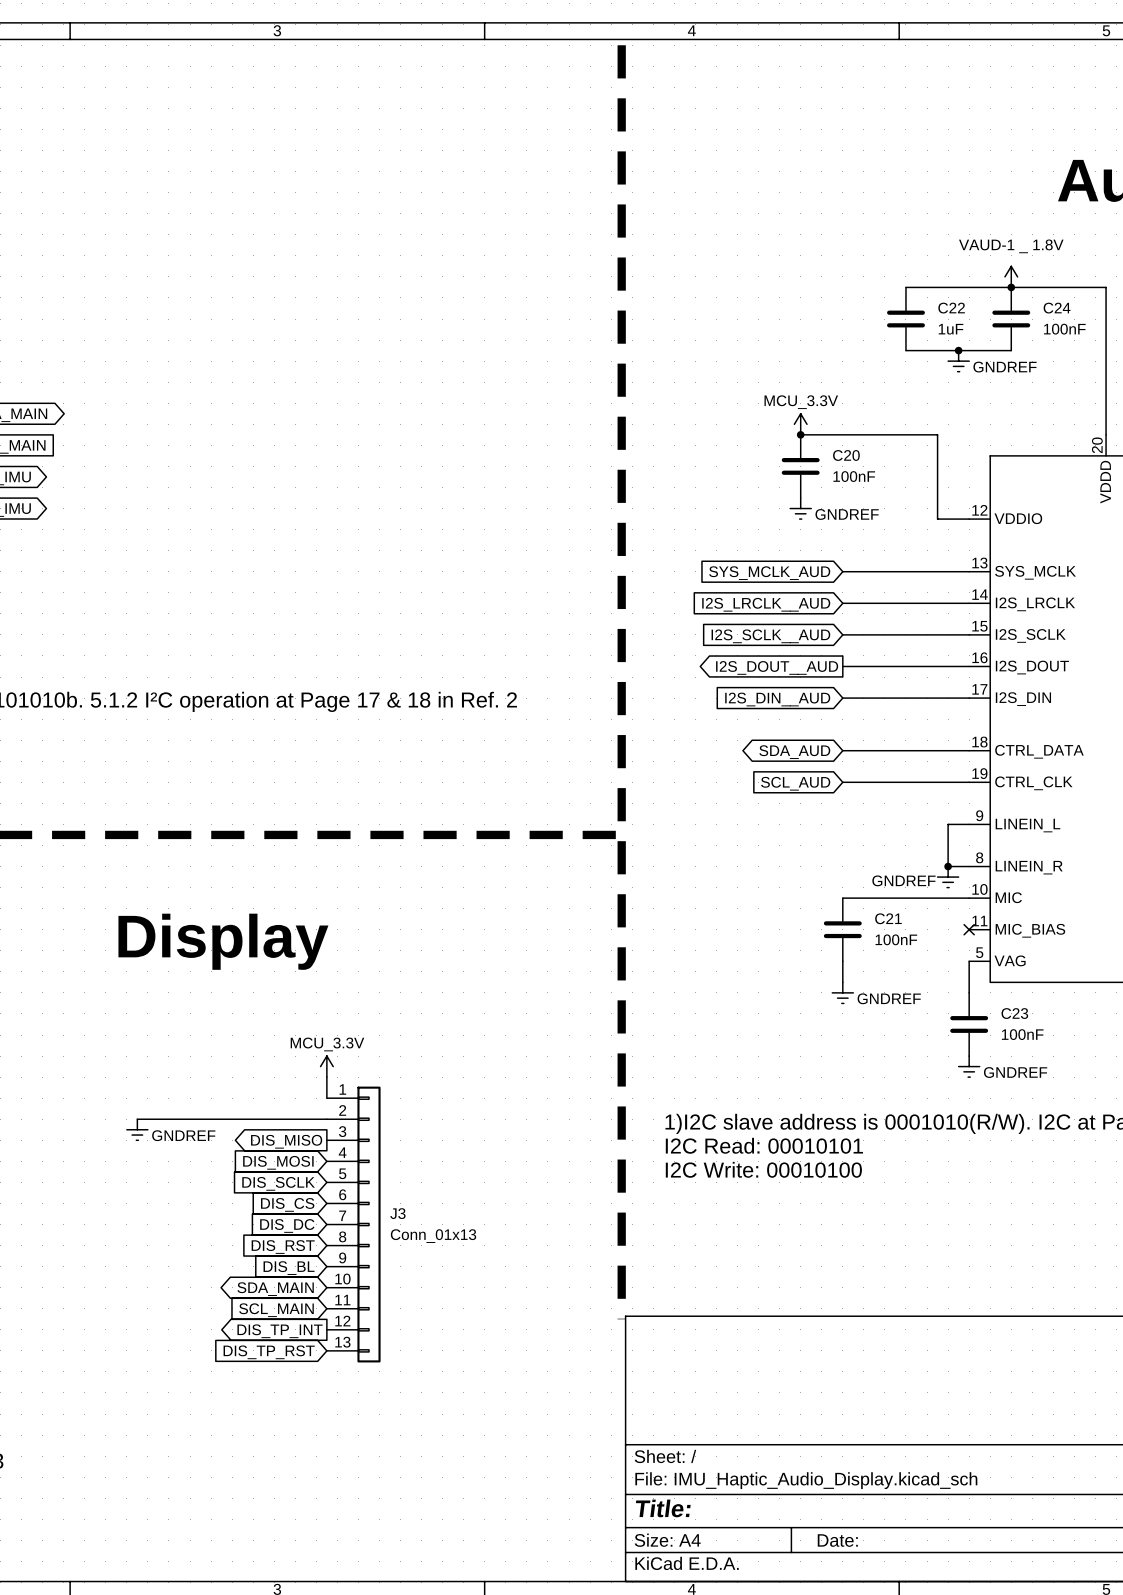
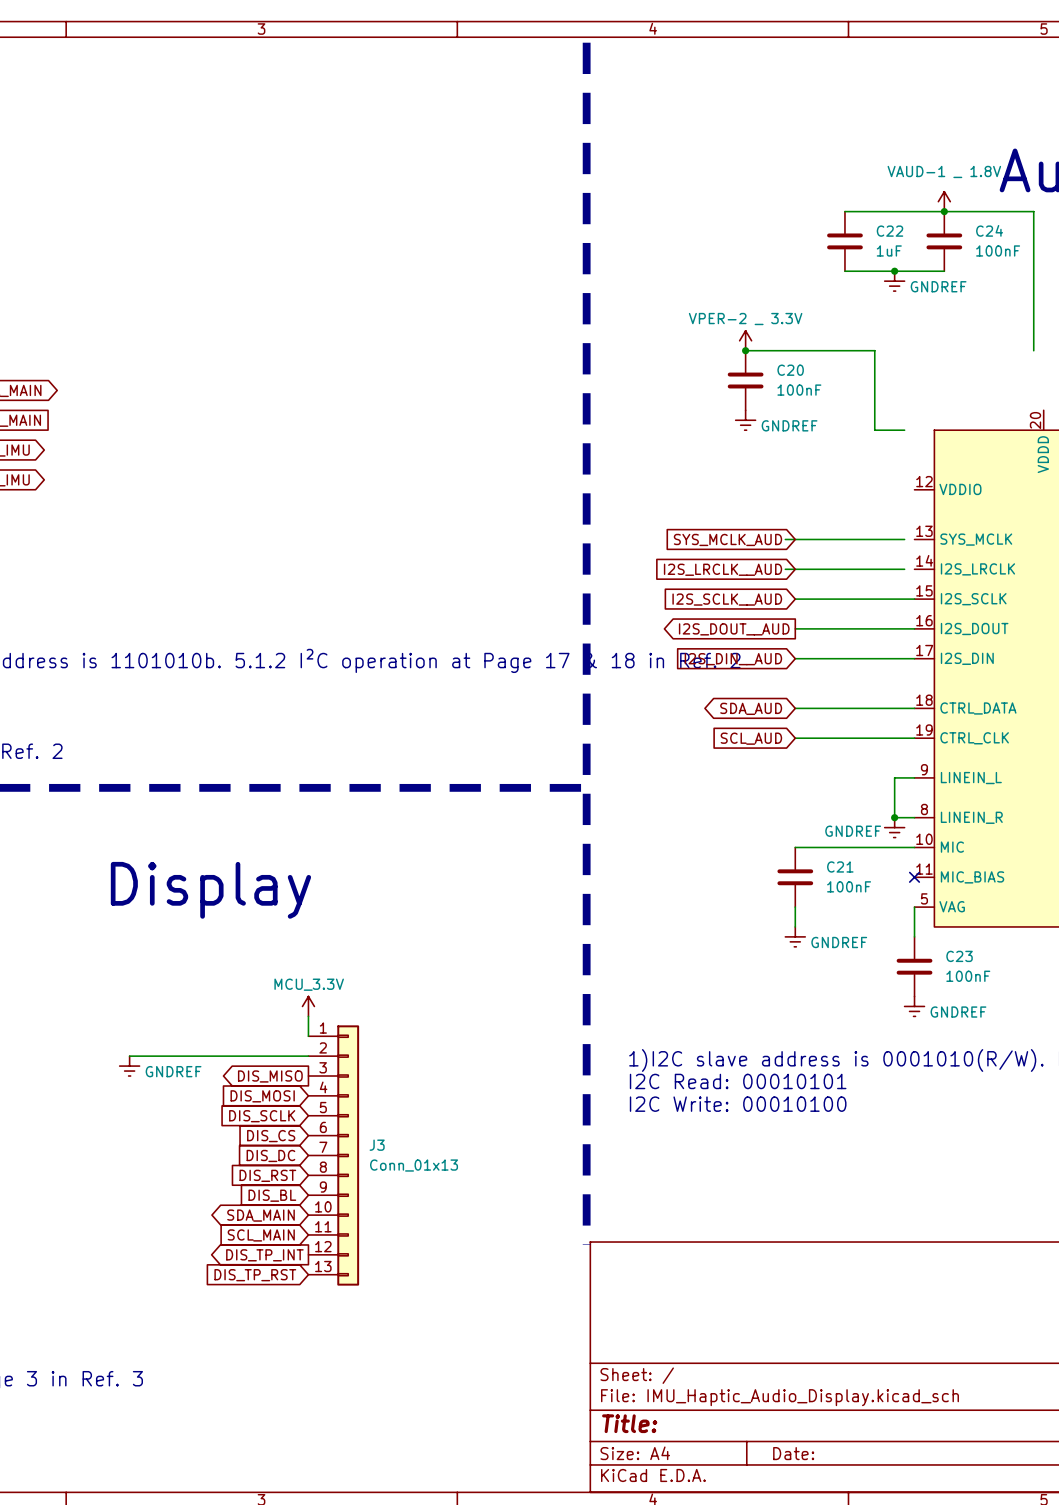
wire: none -> (844, 211) (1033, 211) (1033, 350)
junction: none -> (944, 211)
power symbol position: VAUD-1 _ 1.8V (1011, 276) -> VAUD-1 _ 1.8V (944, 201)
wire: none -> (844, 271) (854, 271)
junction: none -> (894, 271)
wire: (1000, 287) (1106, 287) (1106, 434) -> none
junction: (1011, 287) -> none
C22 position: (905, 319) -> (844, 241)
C24 position: (1011, 319) -> (944, 241)
wire: (905, 350) (1011, 350) -> none
junction: (958, 350) -> none
power symbol: none -> VPER-2 _ 3.3V (745, 340)
power symbol position: GNDREF (958, 361) -> GNDREF (894, 281)
junction: none -> (745, 350)
power symbol: MCU_3.3V (800, 424) -> none
wire: (800, 434) (937, 434) (937, 519) (969, 519) -> (745, 350) (874, 350) (874, 430) (904, 430)
junction: (800, 434) -> none
C20 position: (800, 466) -> (745, 380)
power symbol position: GNDREF (800, 508) -> GNDREF (745, 420)
wire: (958, 571) (969, 571) -> (785, 539) (795, 539)
wire: (958, 603) (969, 603) -> (785, 569) (795, 569)

